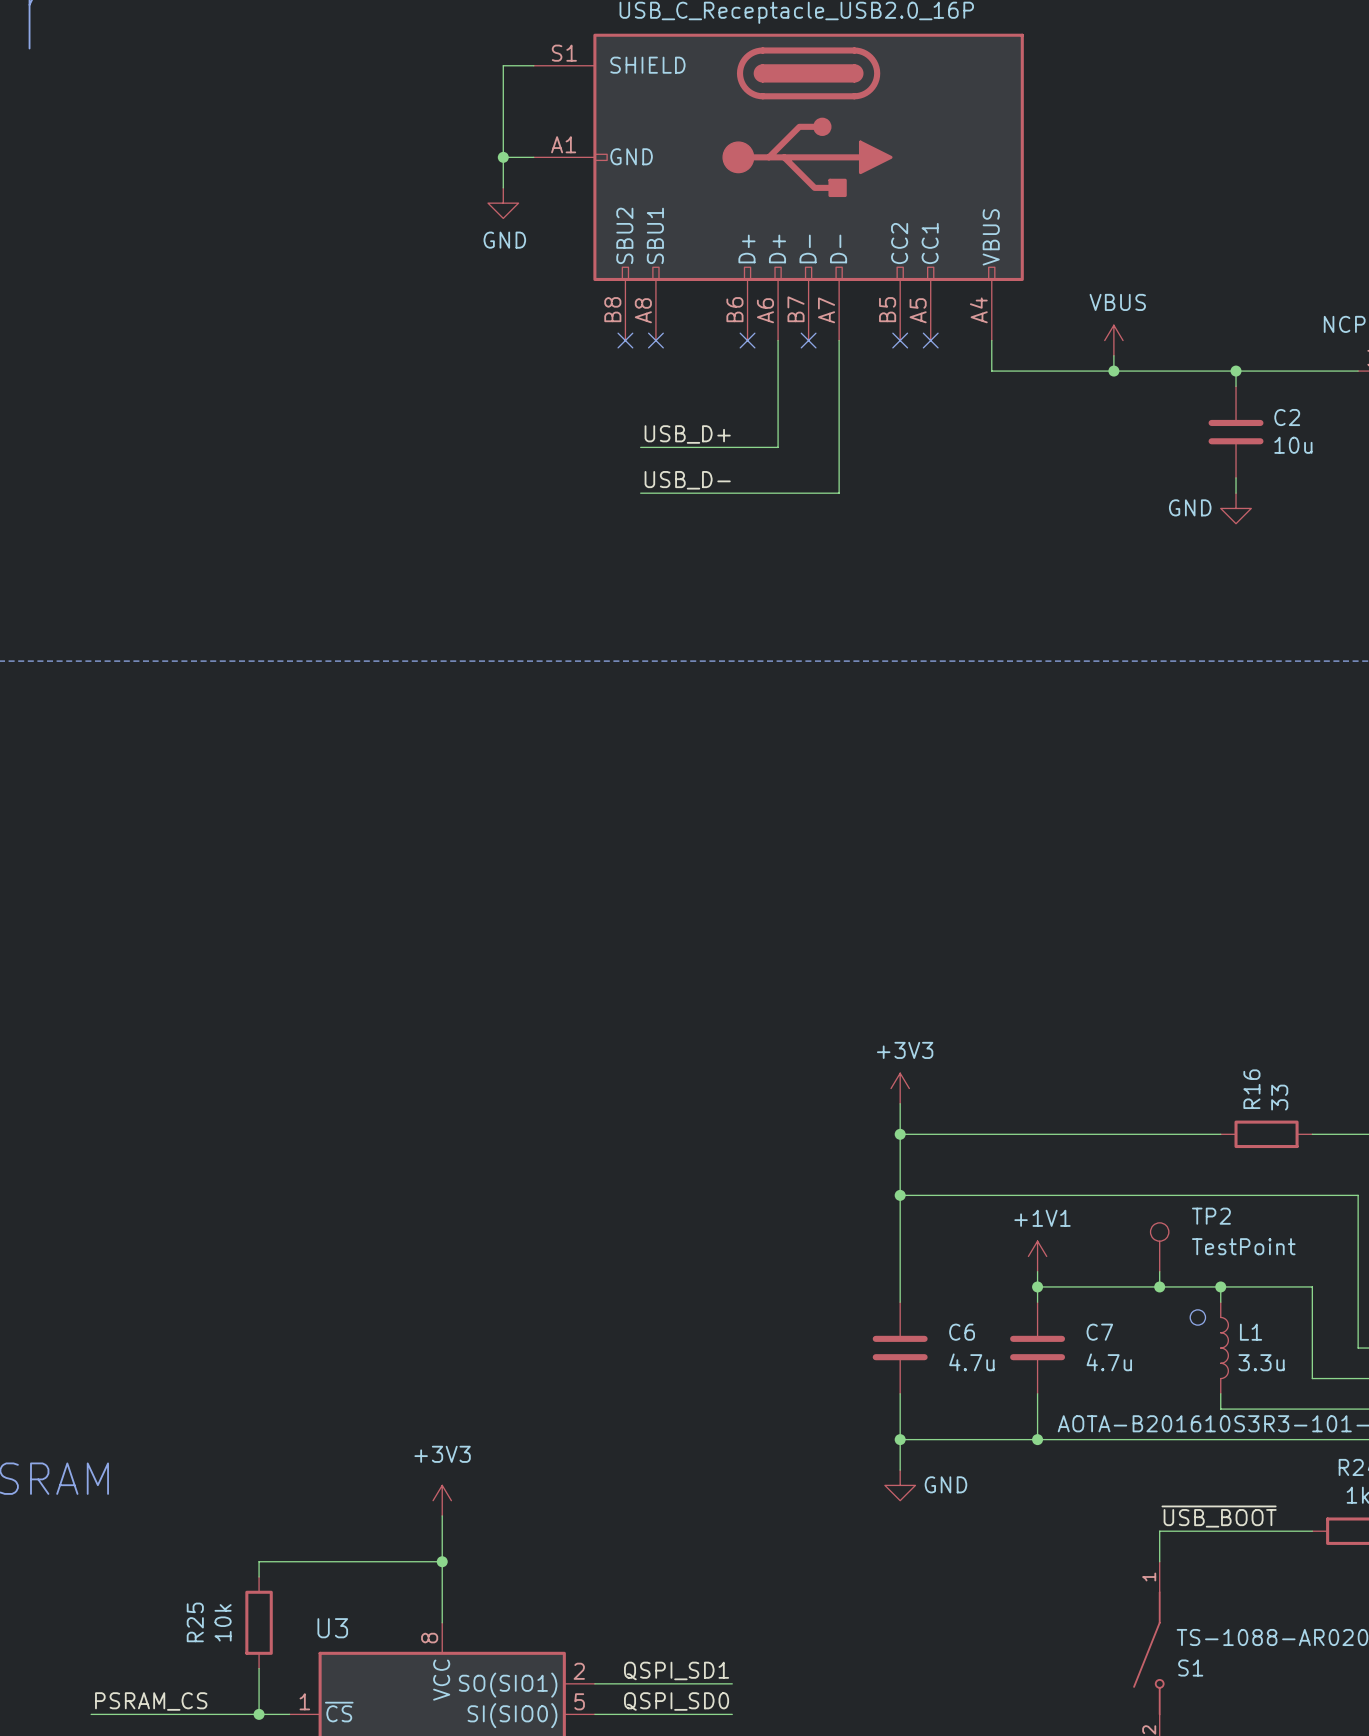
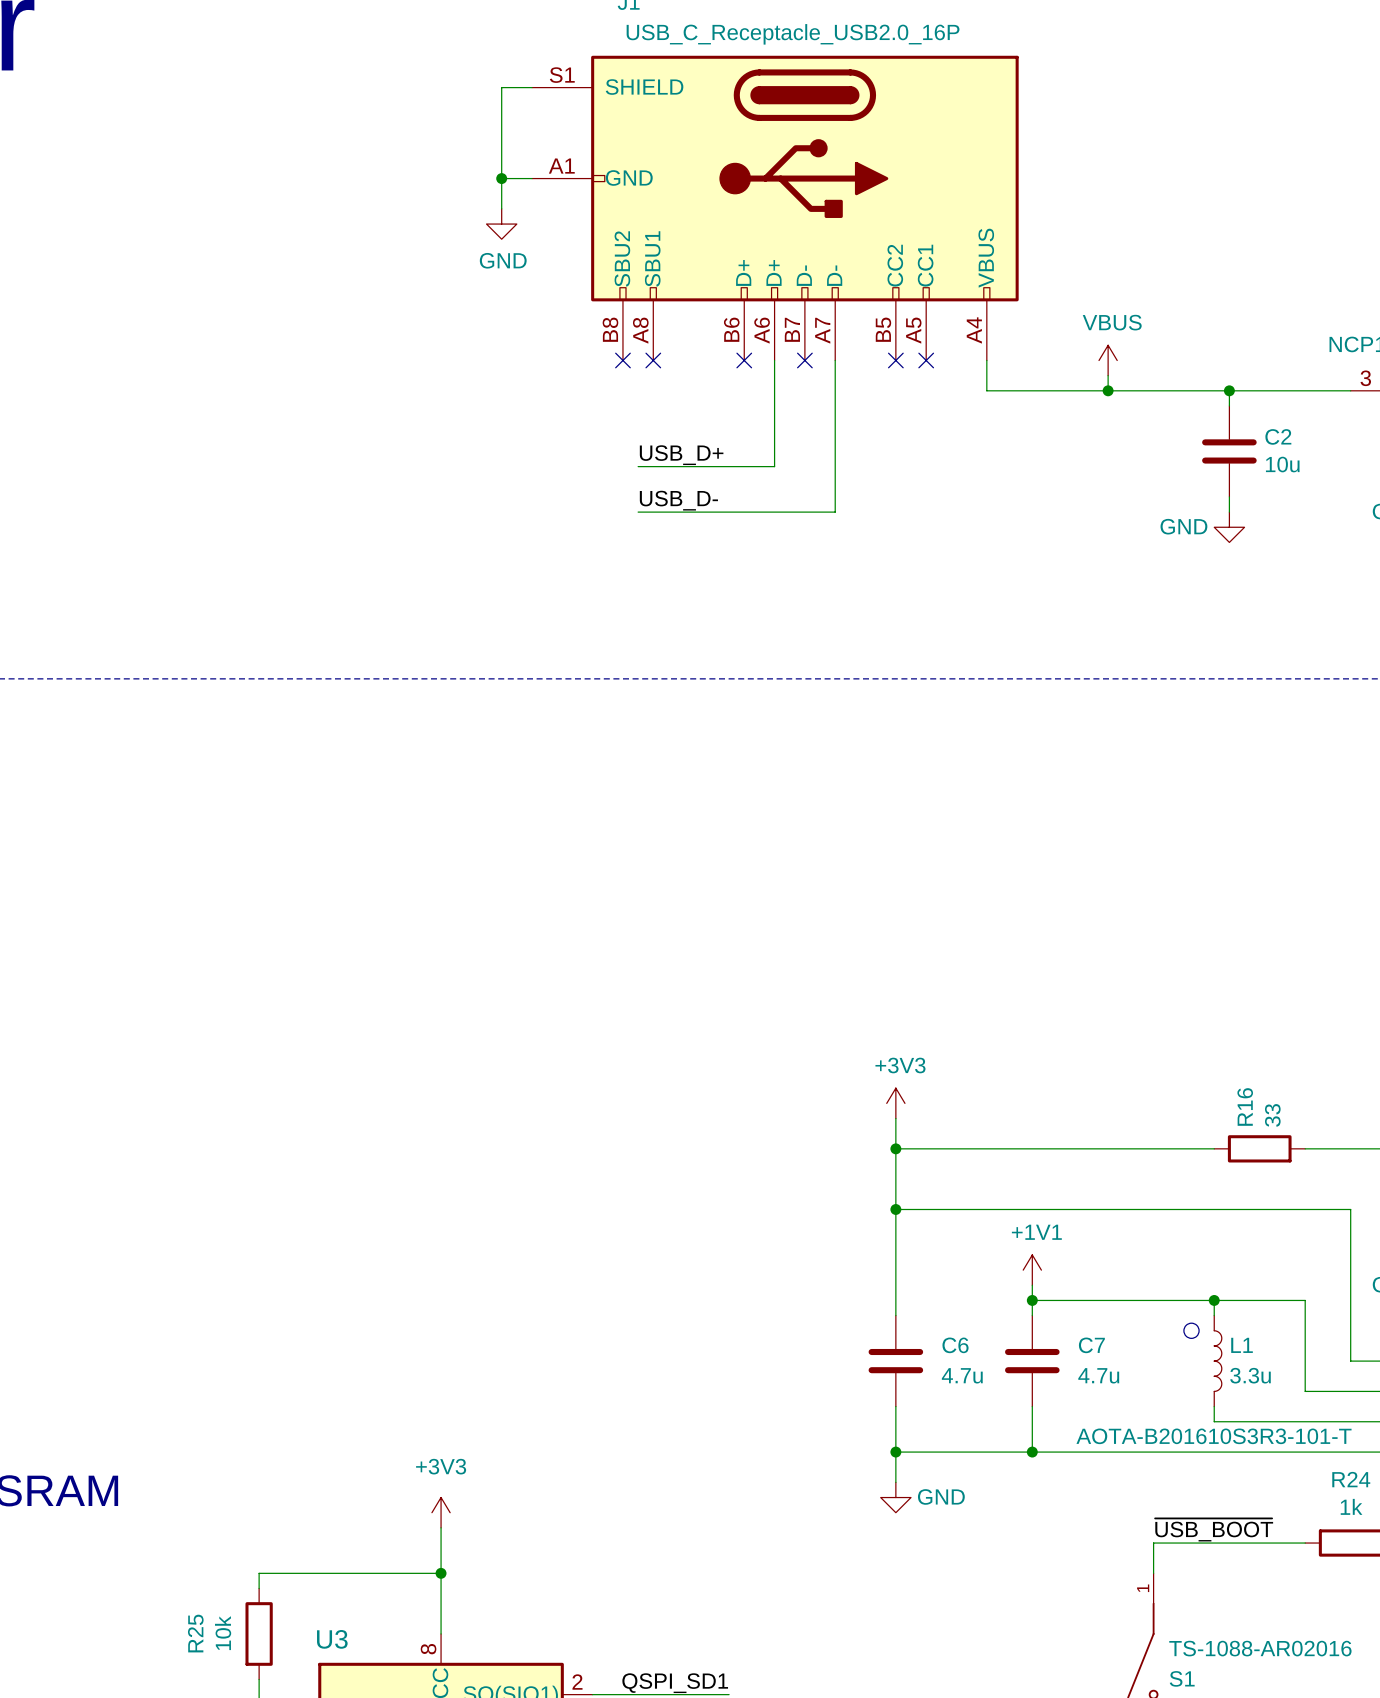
TP2: TestPoint (1159, 1247) -> none
wire: (1159, 1271) (1159, 1286) -> none
junction: (1159, 1286) -> none

